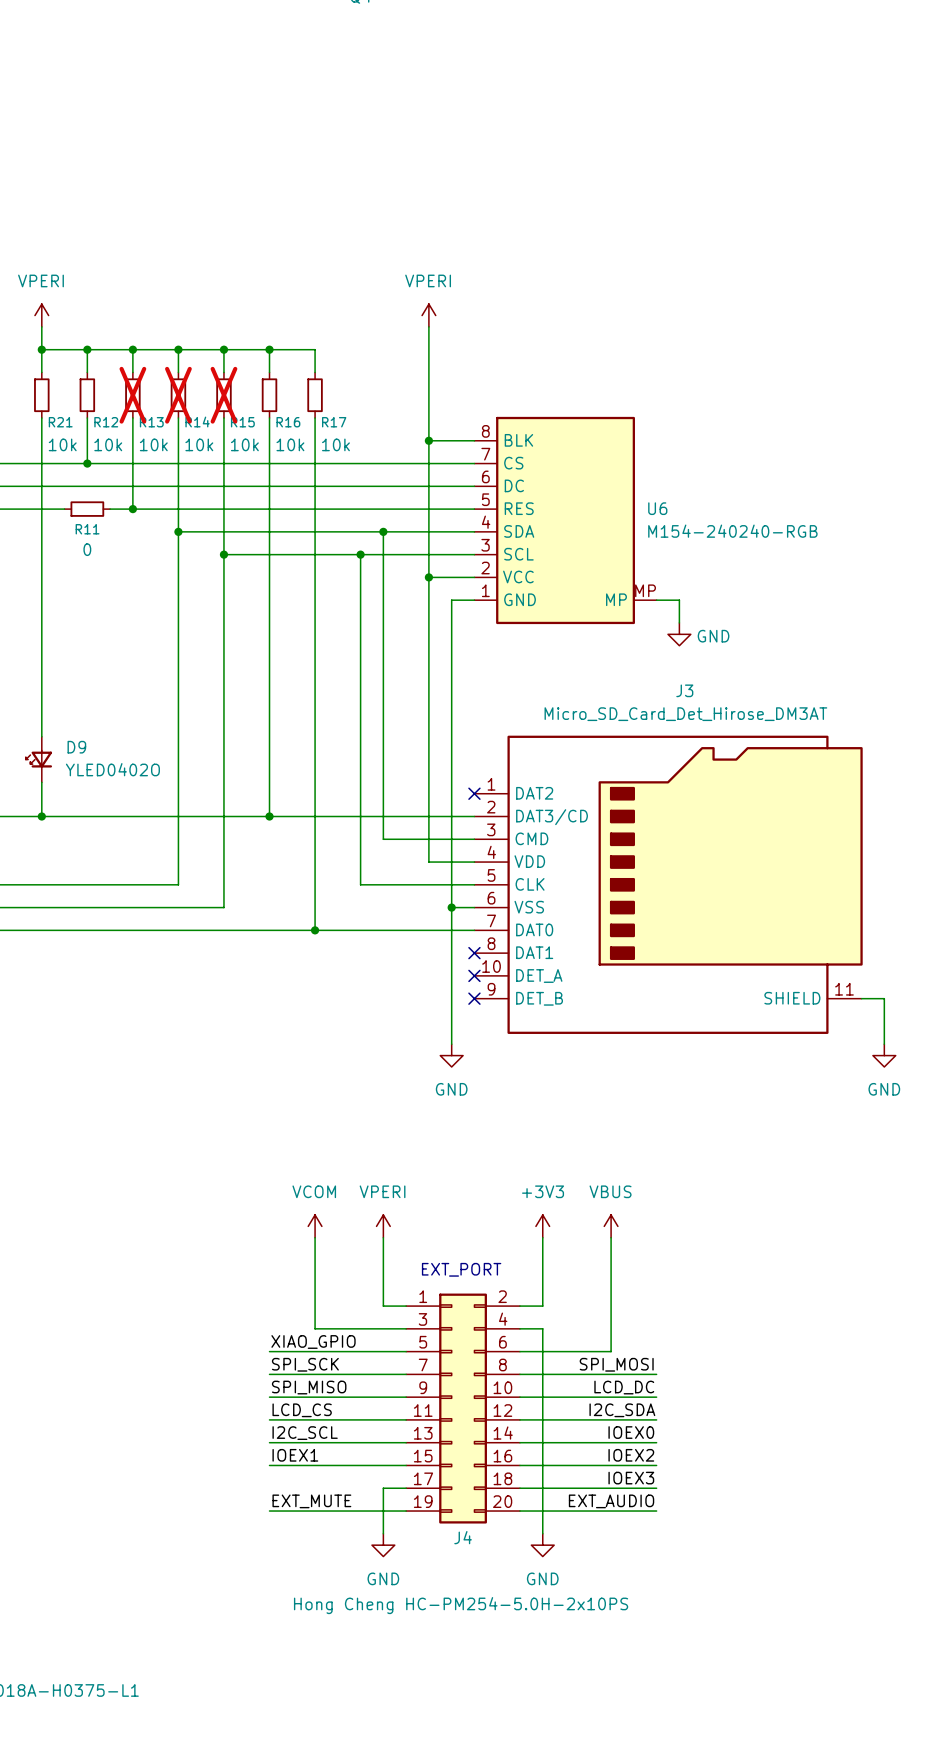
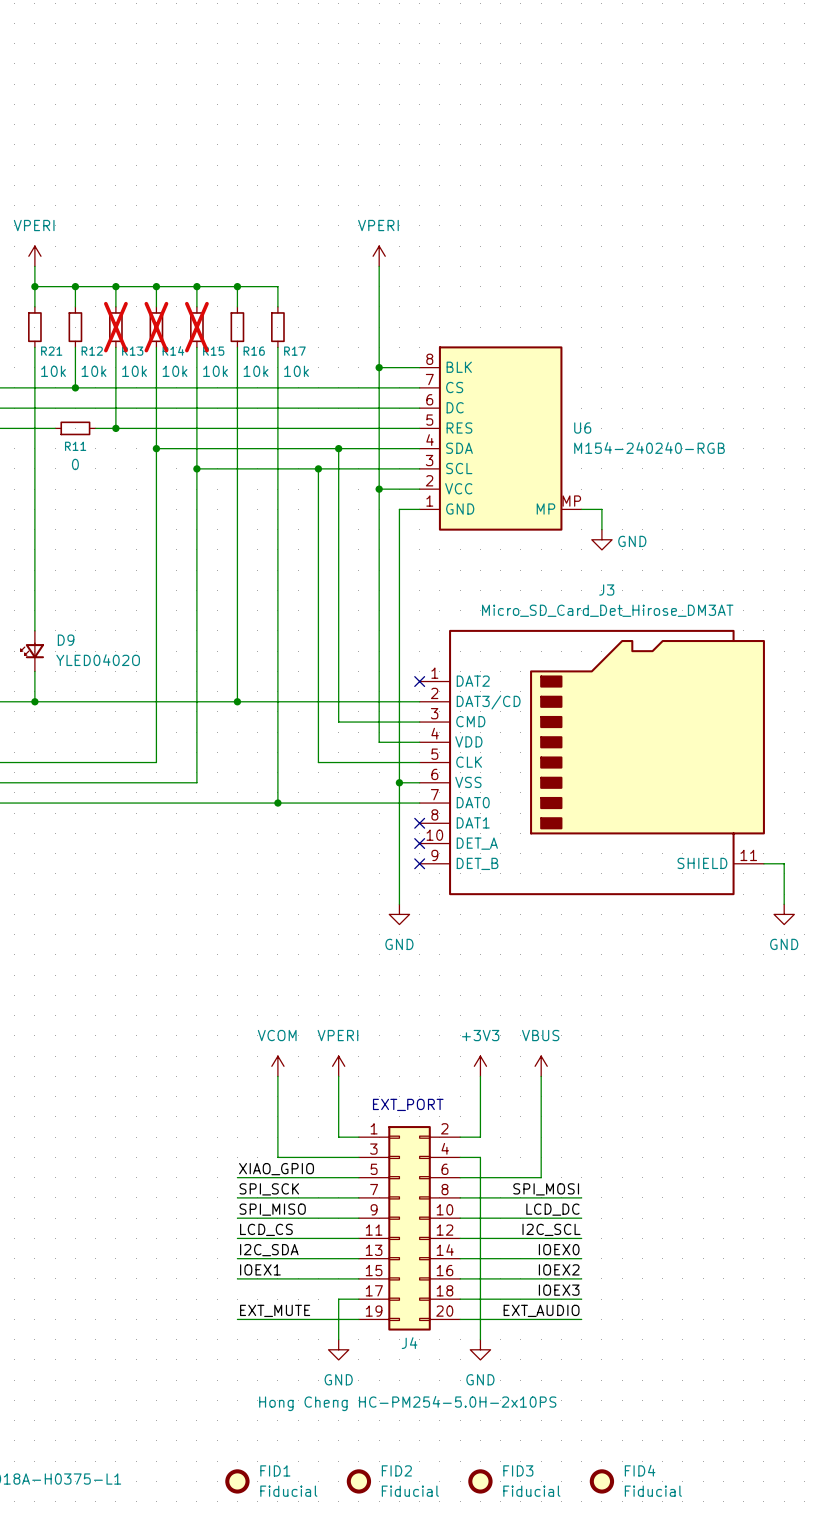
label: I2C_SDA (622, 1410) -> I2C_SCL (551, 1229)
label: I2C_SCL (305, 1433) -> I2C_SDA (269, 1250)
FID1: none -> Fiducial (237, 1481)
FID2: none -> Fiducial (358, 1481)
FID3: none -> Fiducial (480, 1481)
FID4: none -> Fiducial (601, 1481)

